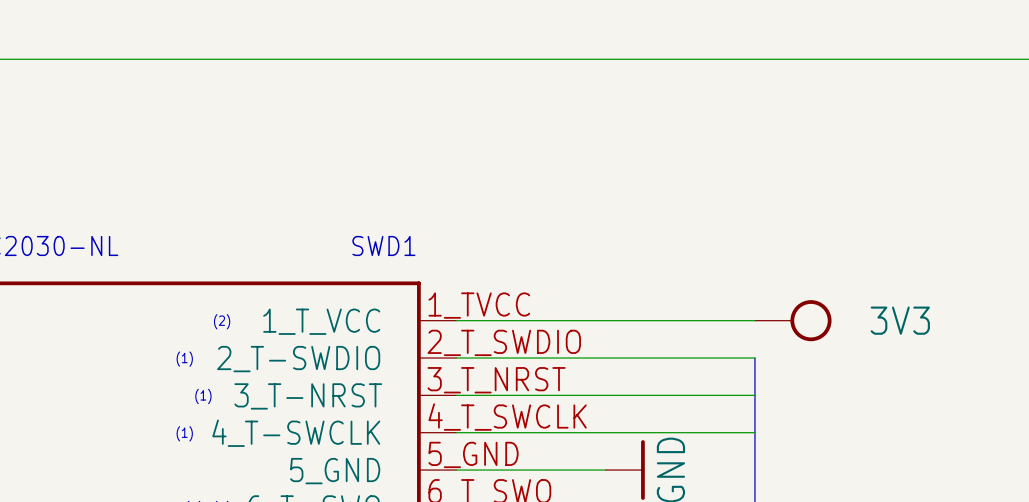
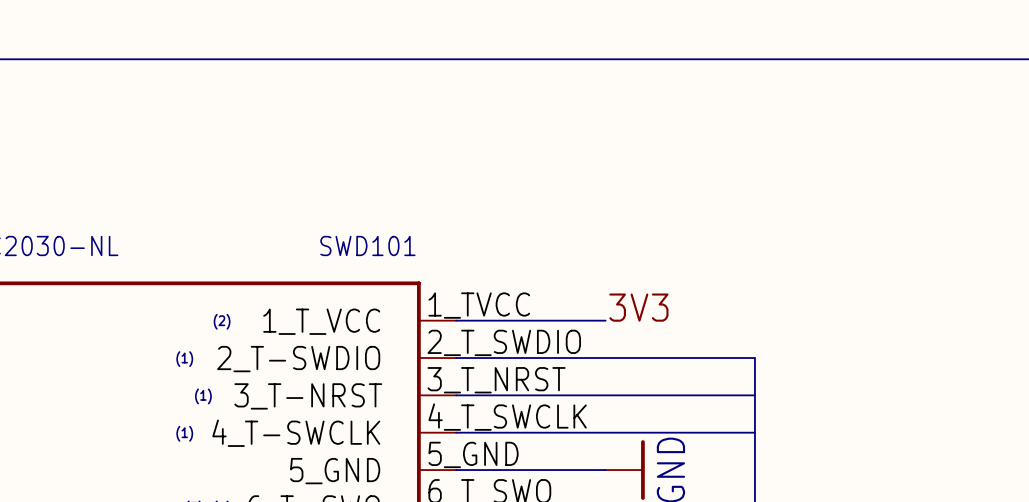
SWD1 name: SWD1 (383, 245) -> SWD101 (367, 245)
label: none -> 3V3 (638, 307)
wire: (605, 320) (754, 320) -> none
power symbol: 3V3 (793, 320) -> none

